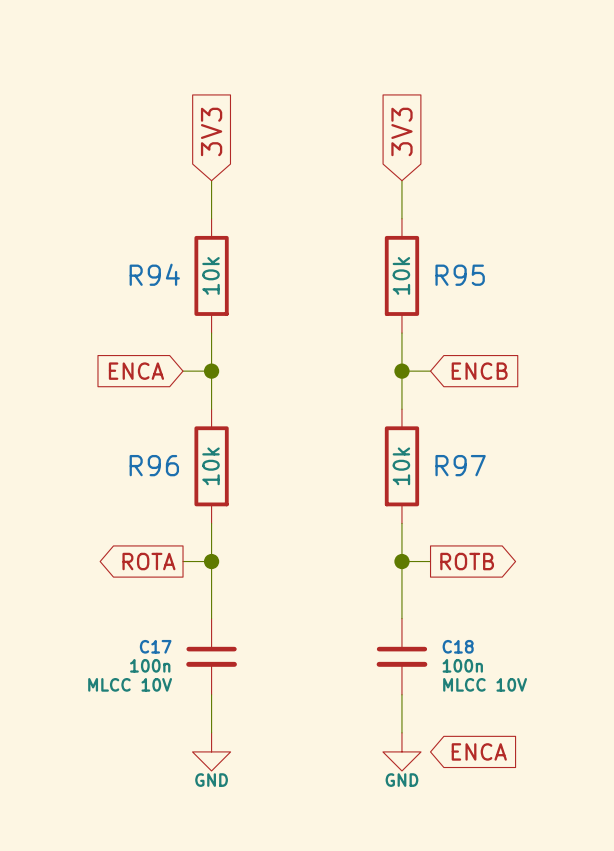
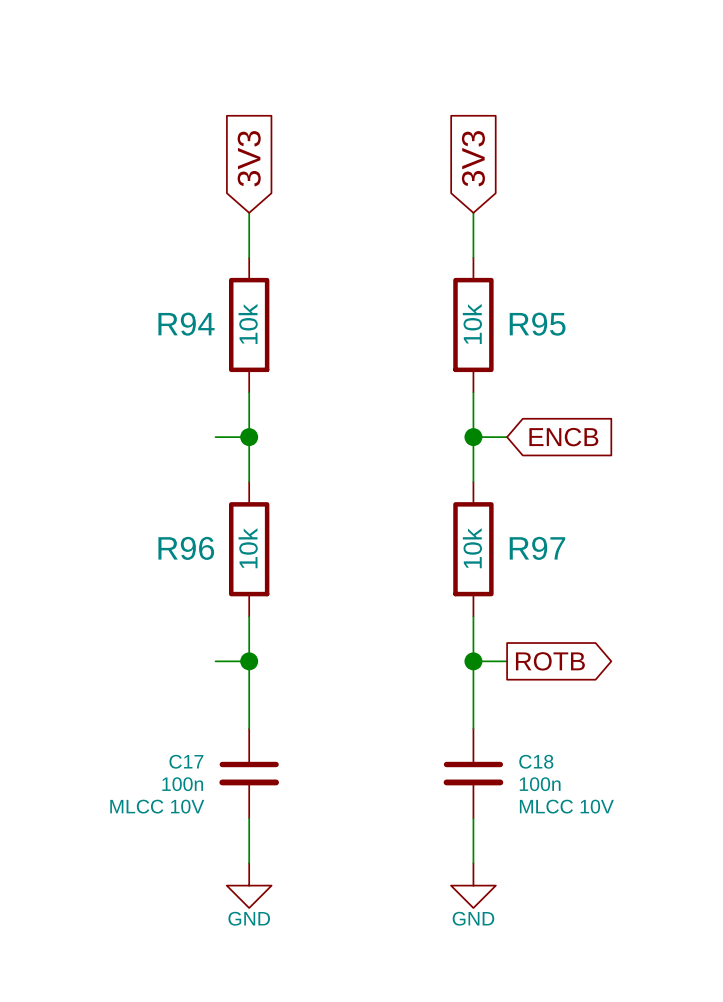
global label: ENCA (136, 371) -> none
global label: ROTA (148, 561) -> none
global label: ENCA (479, 751) -> none

